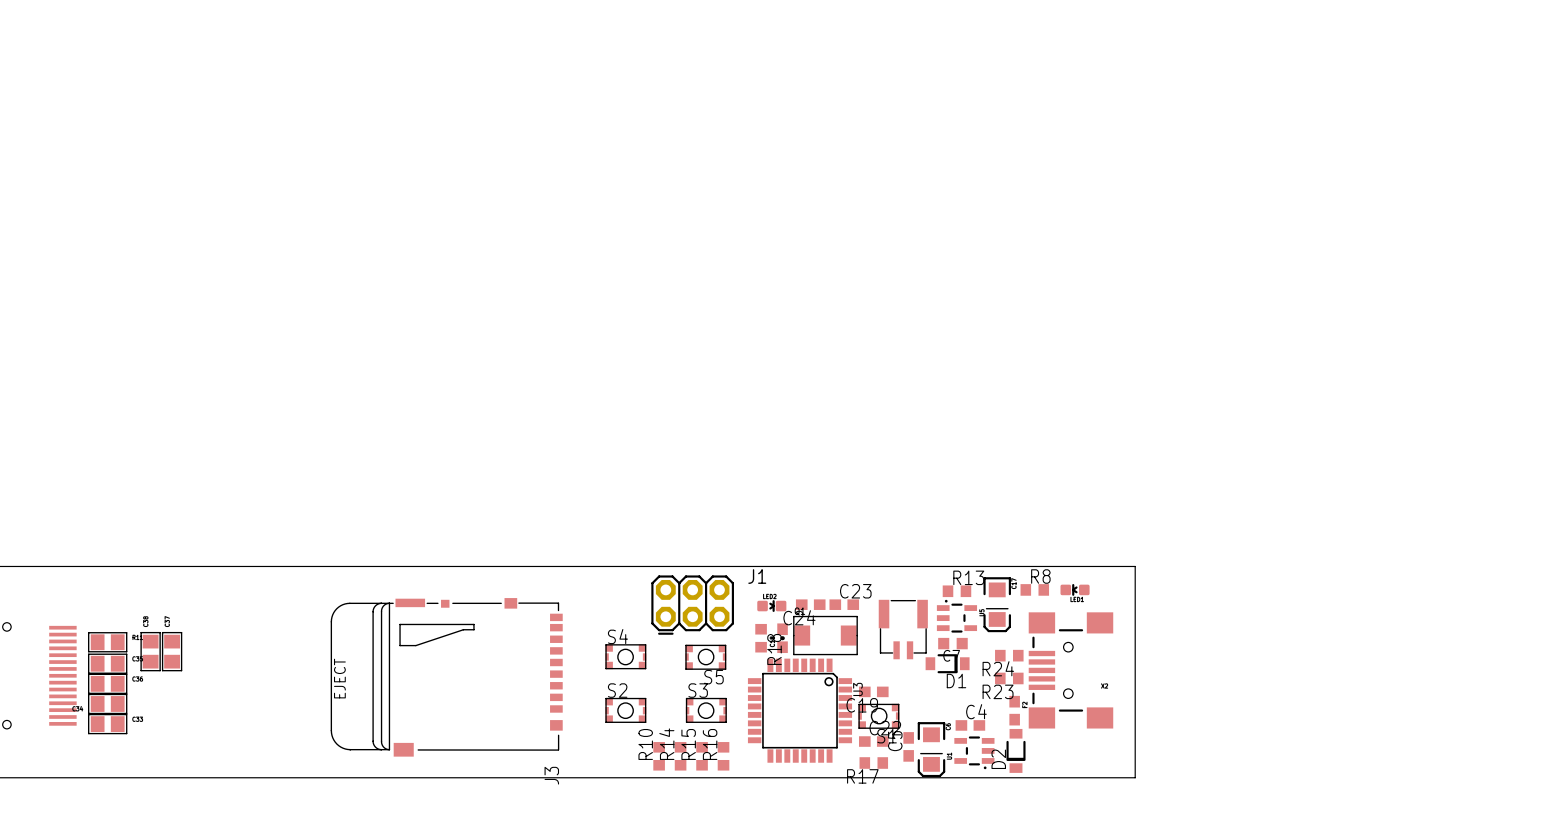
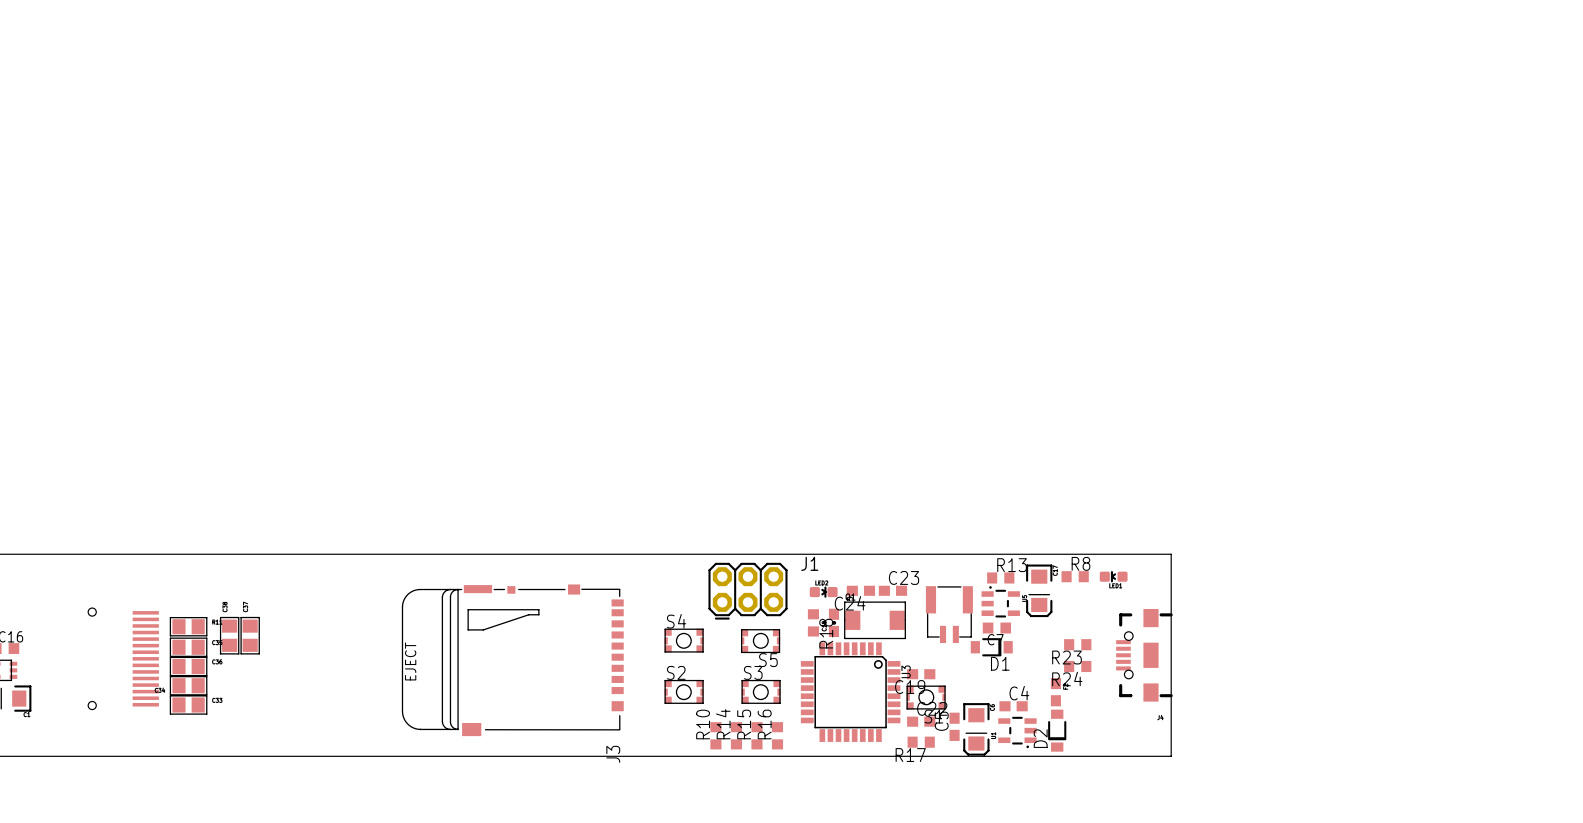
R24 position: (1009, 655) -> (1077, 666)
part: (1070, 670) -> none
part: none -> (1144, 655)
R23 position: (1009, 678) -> (1077, 644)

